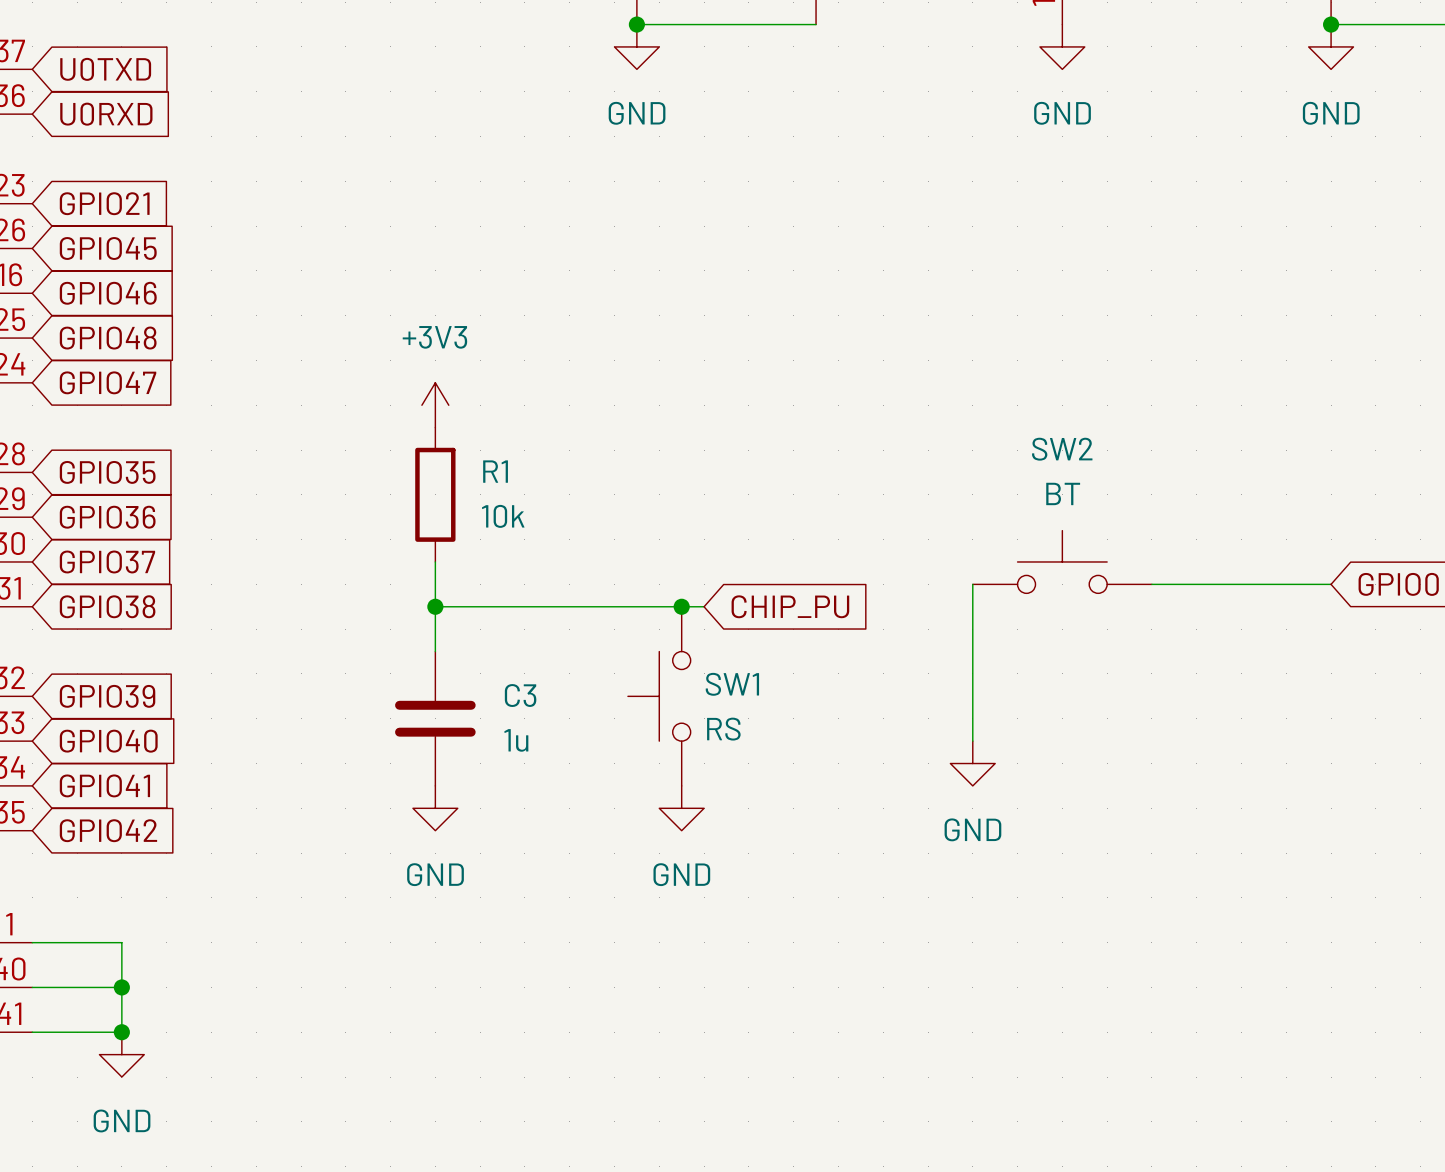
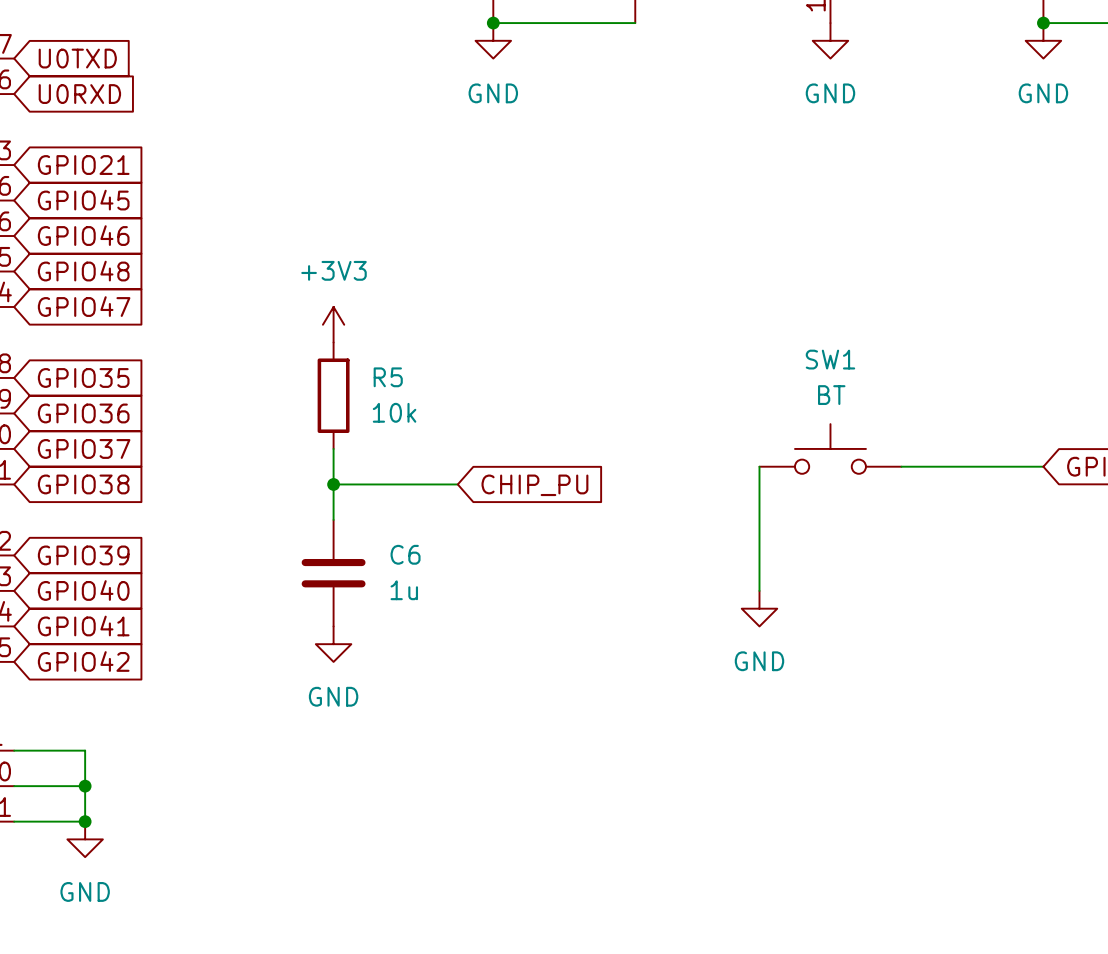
SW2 name: SW2 (1062, 449) -> SW1 (830, 359)
R1 name: R1 (495, 471) -> R5 (388, 377)
wire: (592, 606) (704, 606) -> none
junction: (681, 606) -> none
global label position: CHIP_PU (790, 606) -> CHIP_PU (534, 485)
C3 name: C3 (520, 695) -> C6 (405, 554)
SW1: RS (659, 696) -> none
power symbol: GND (681, 808) -> none

